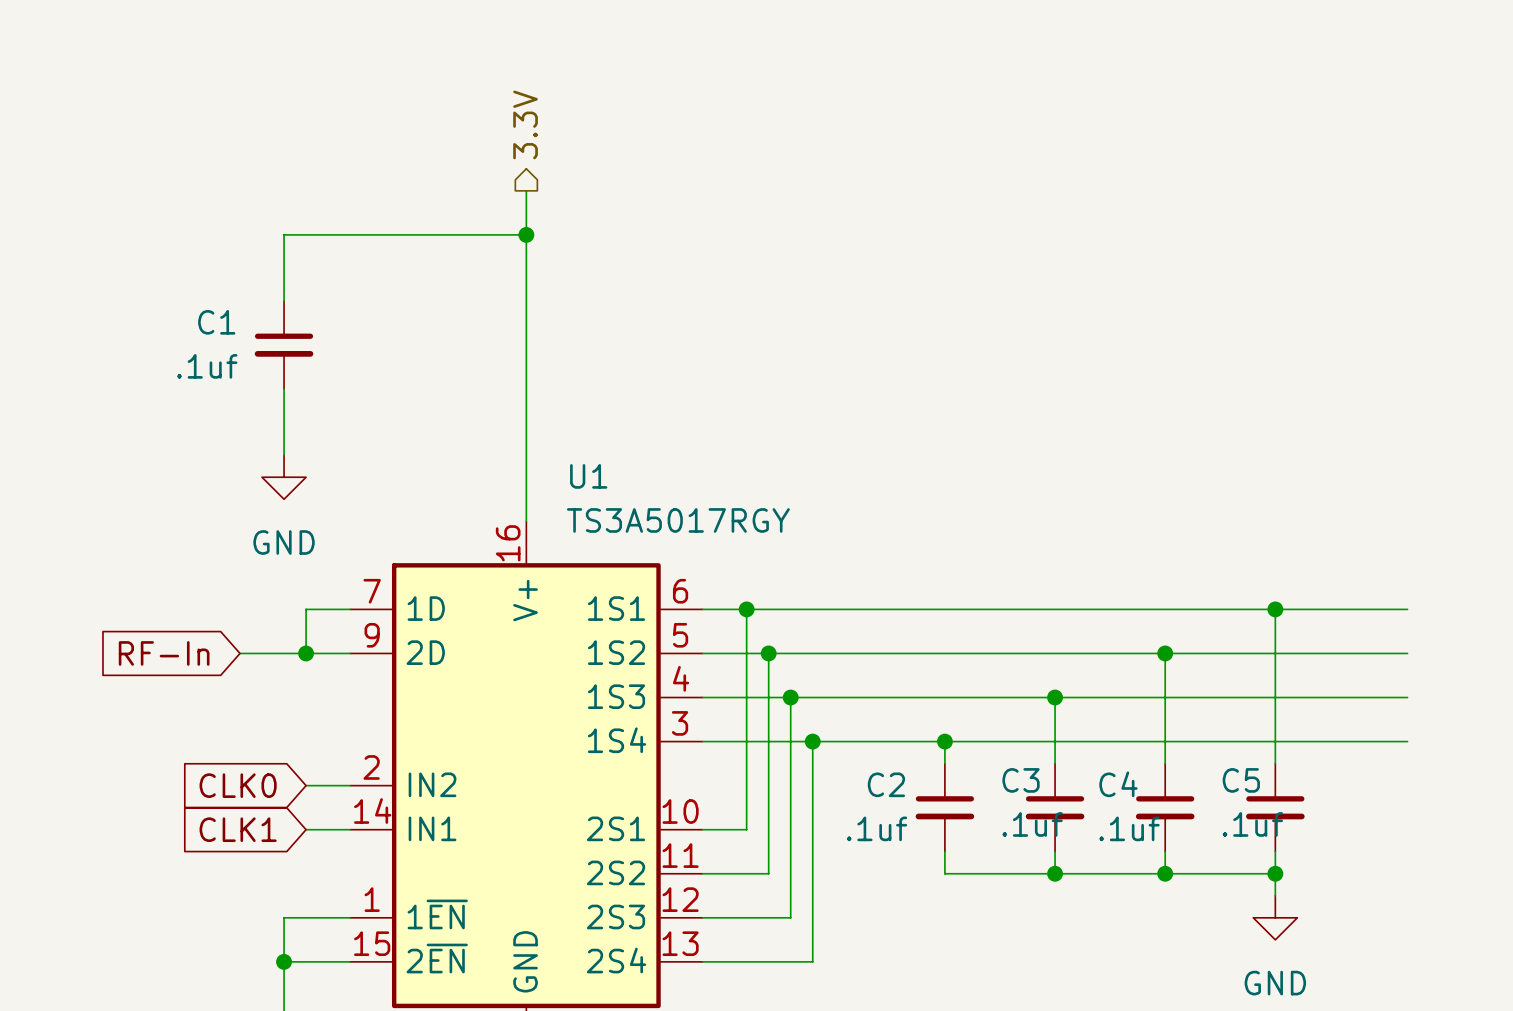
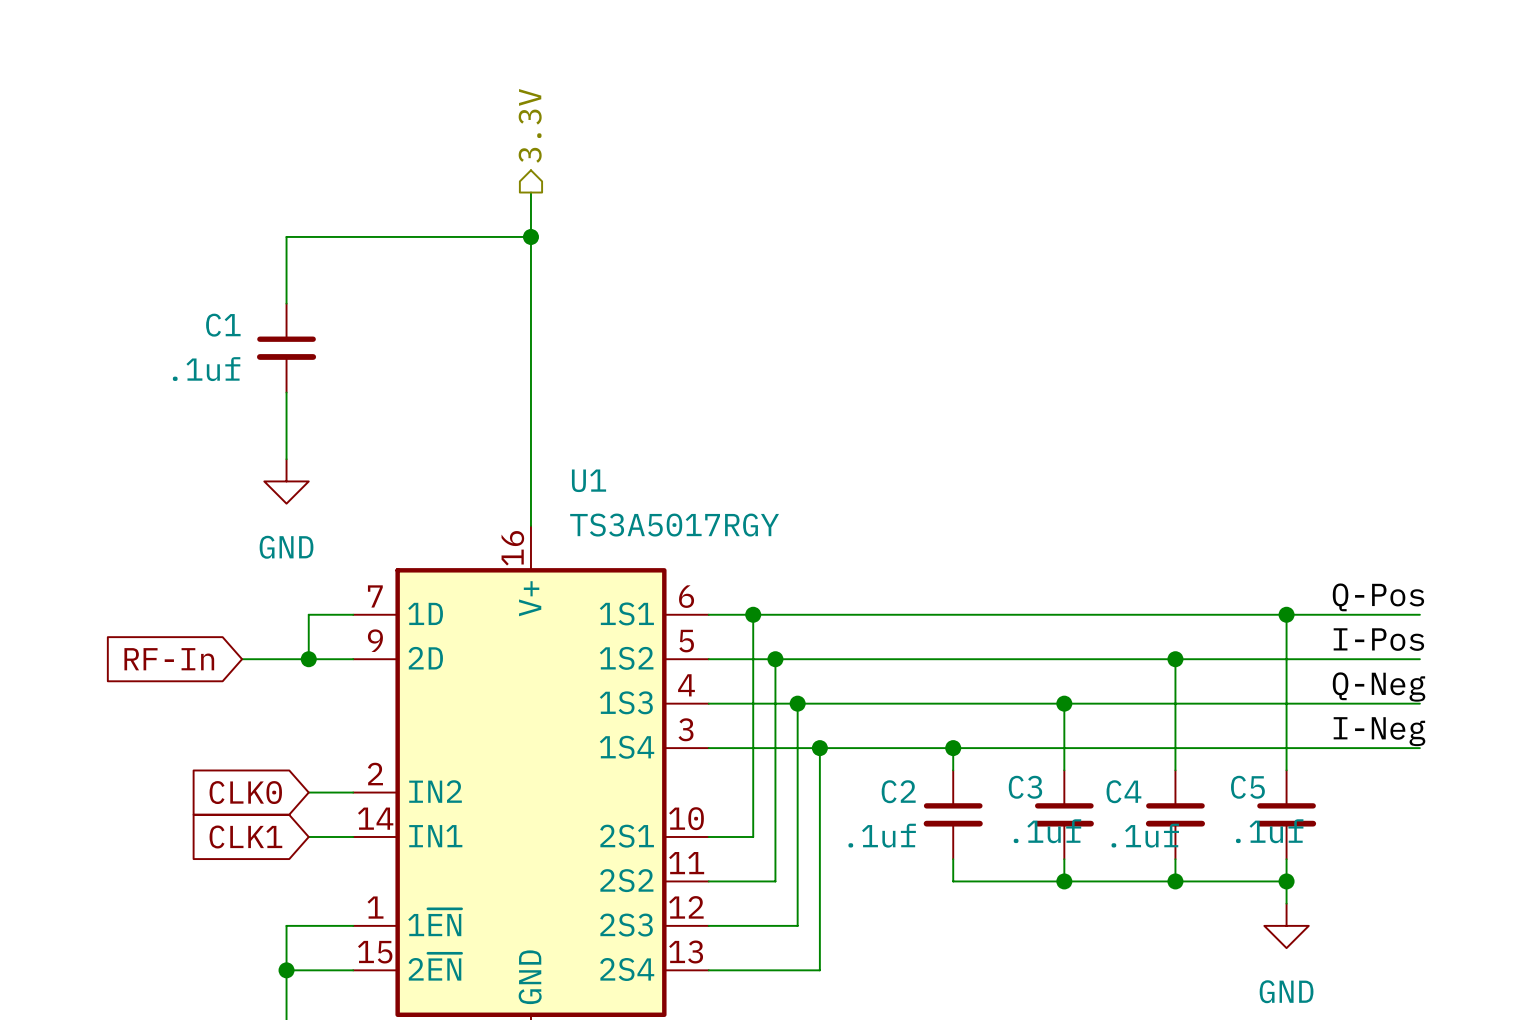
label: none -> Q-Pos (1378, 597)
label: none -> I-Pos (1378, 639)
label: none -> Q-Neg (1379, 687)
label: none -> I-Neg (1379, 731)

